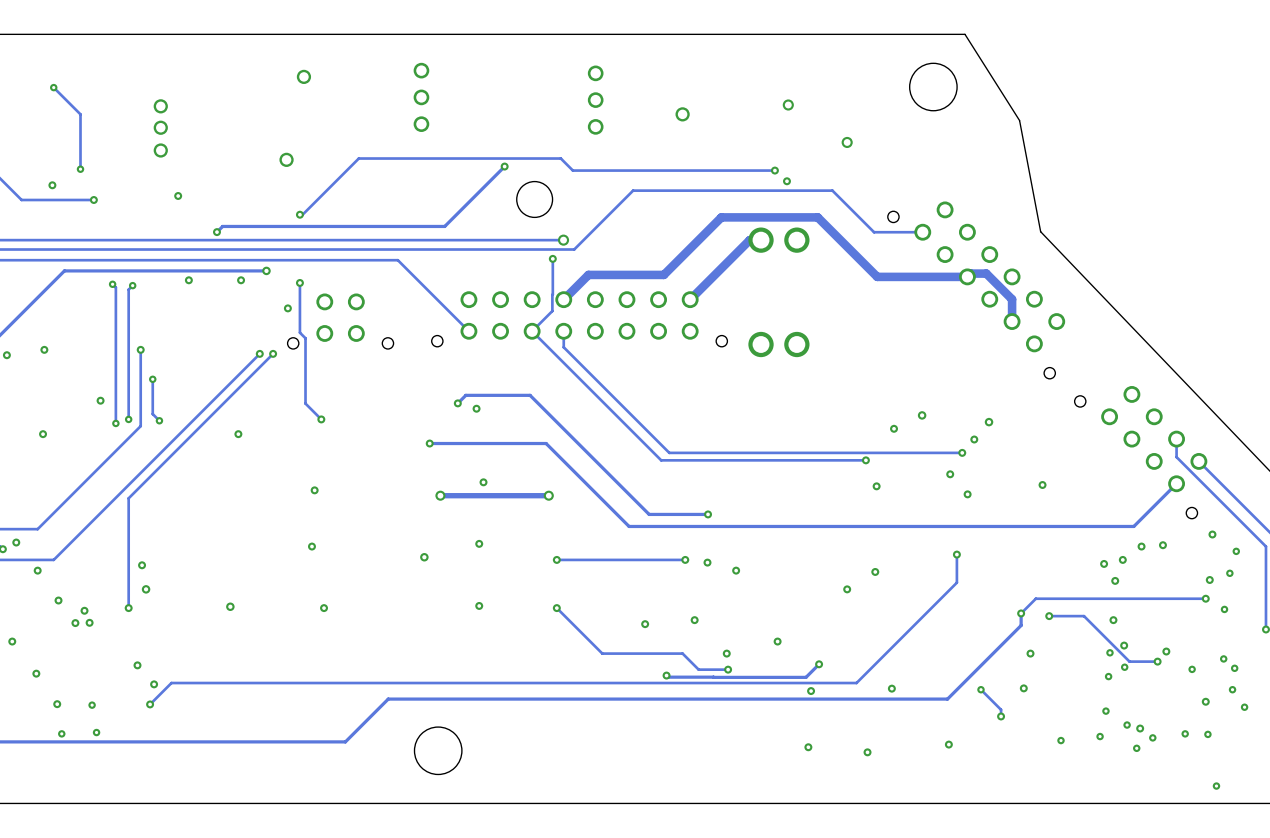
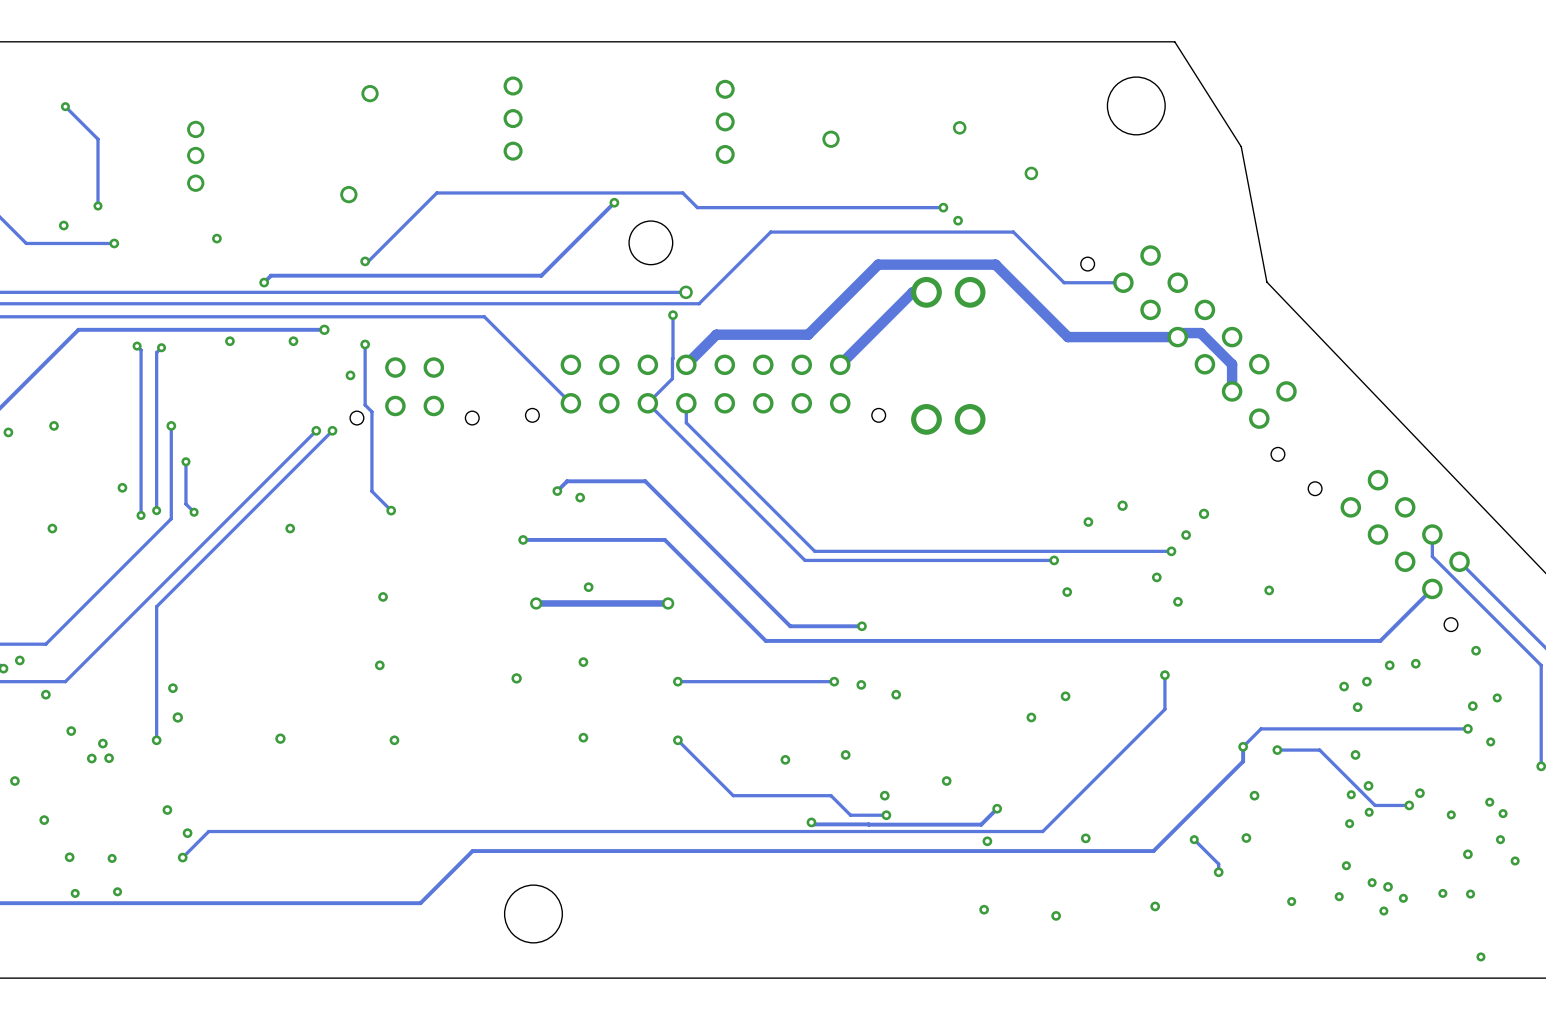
via: (1236, 551) -> none

